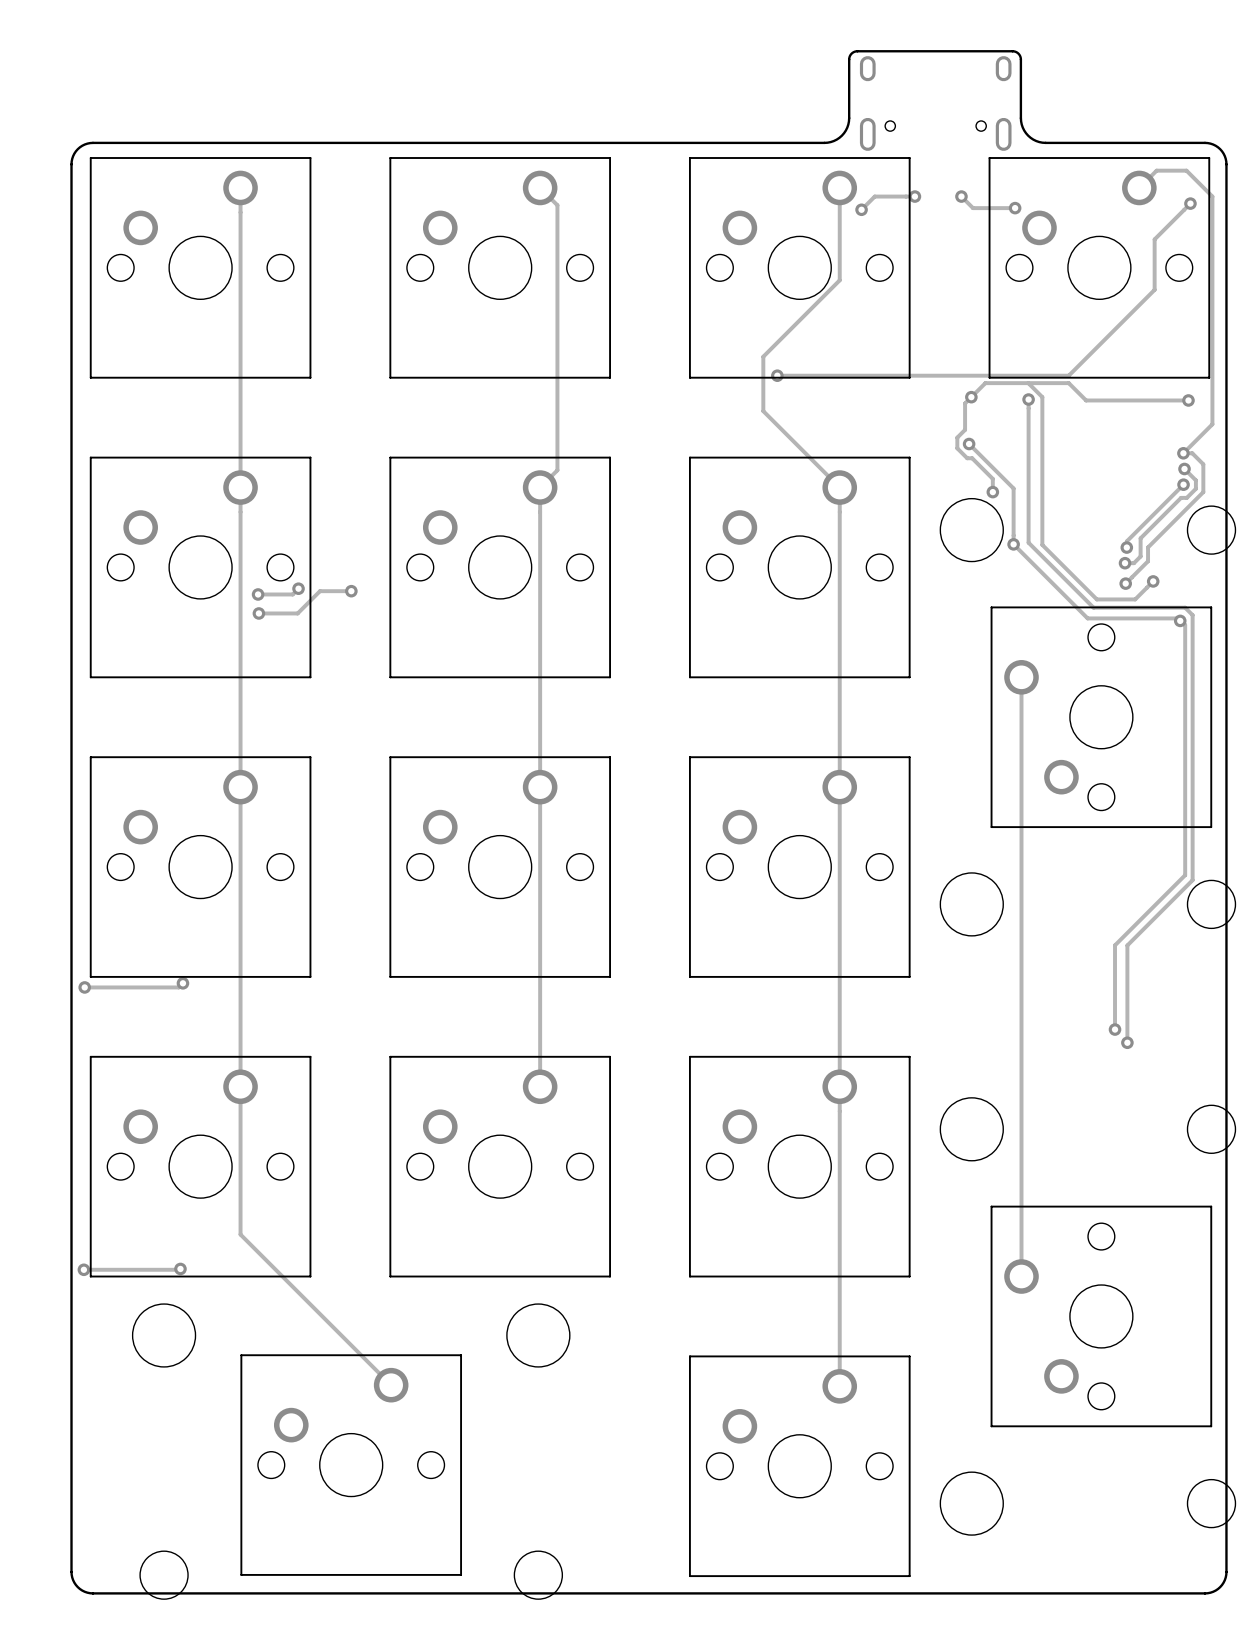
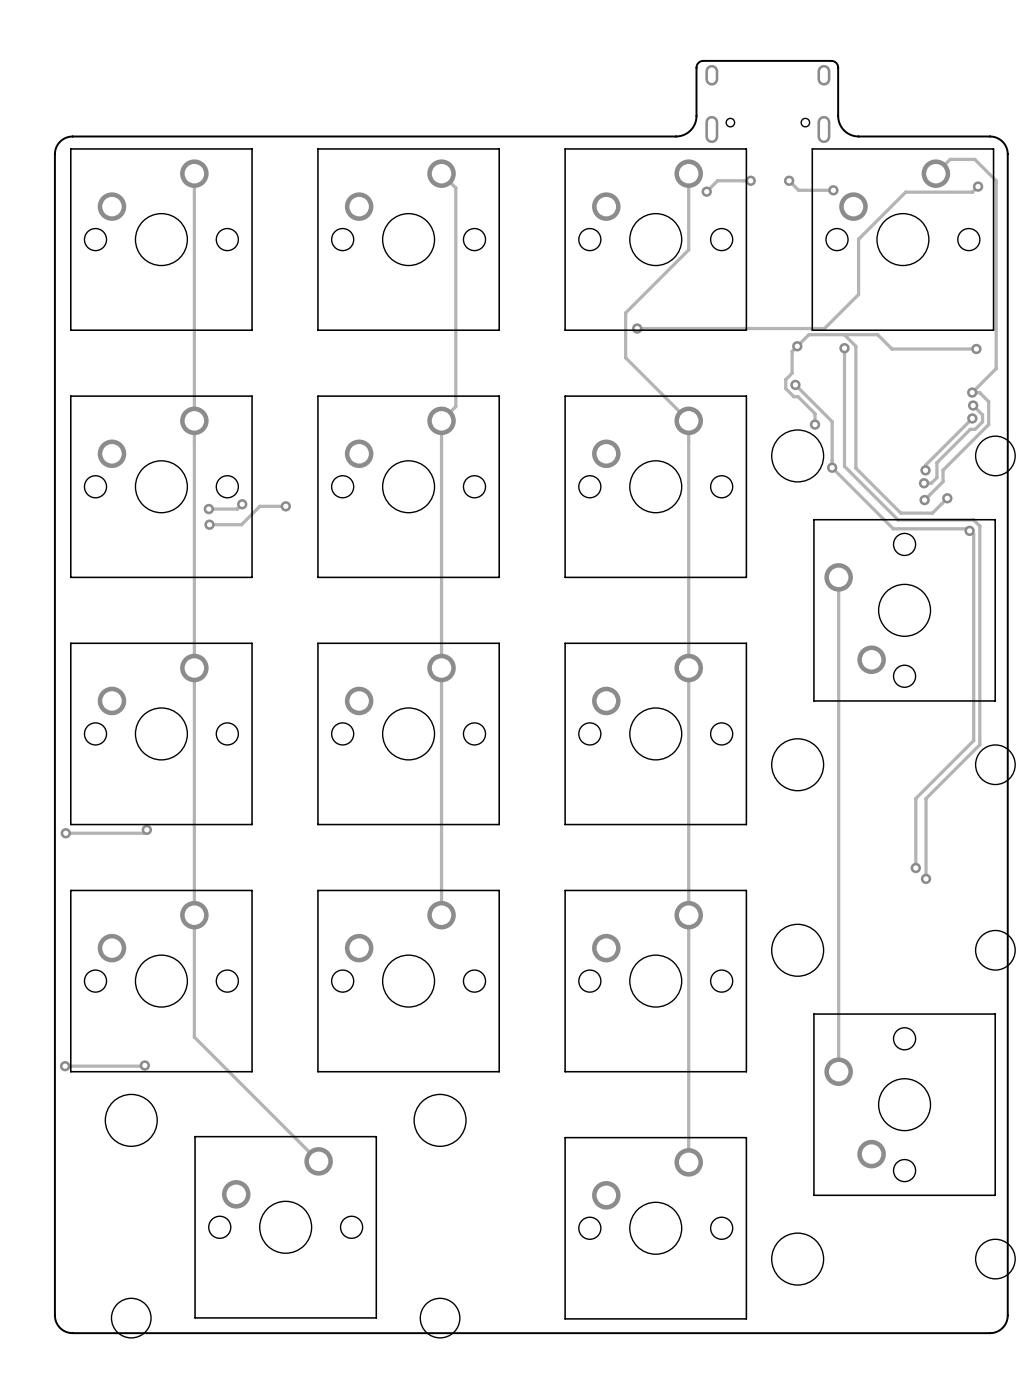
track: (1183, 210) (1154, 239) (1154, 289) (1068, 375) (1004, 375) -> (972, 192) (905, 192) (858, 239) (858, 294) (824, 328)

